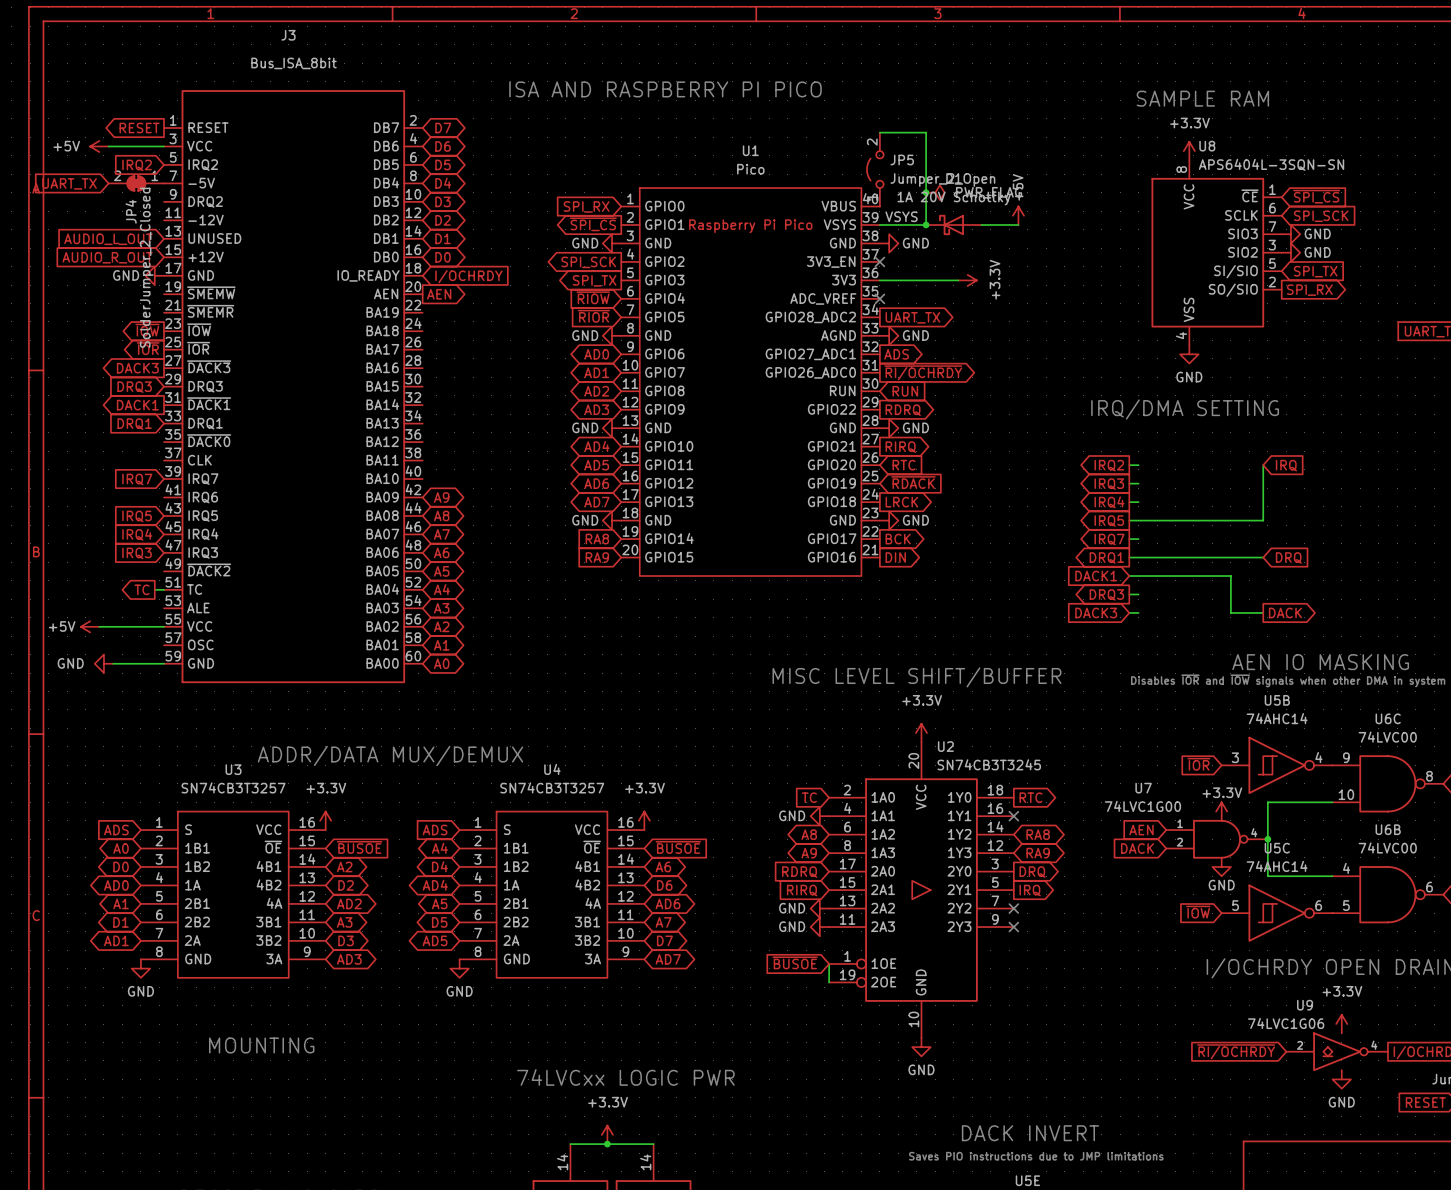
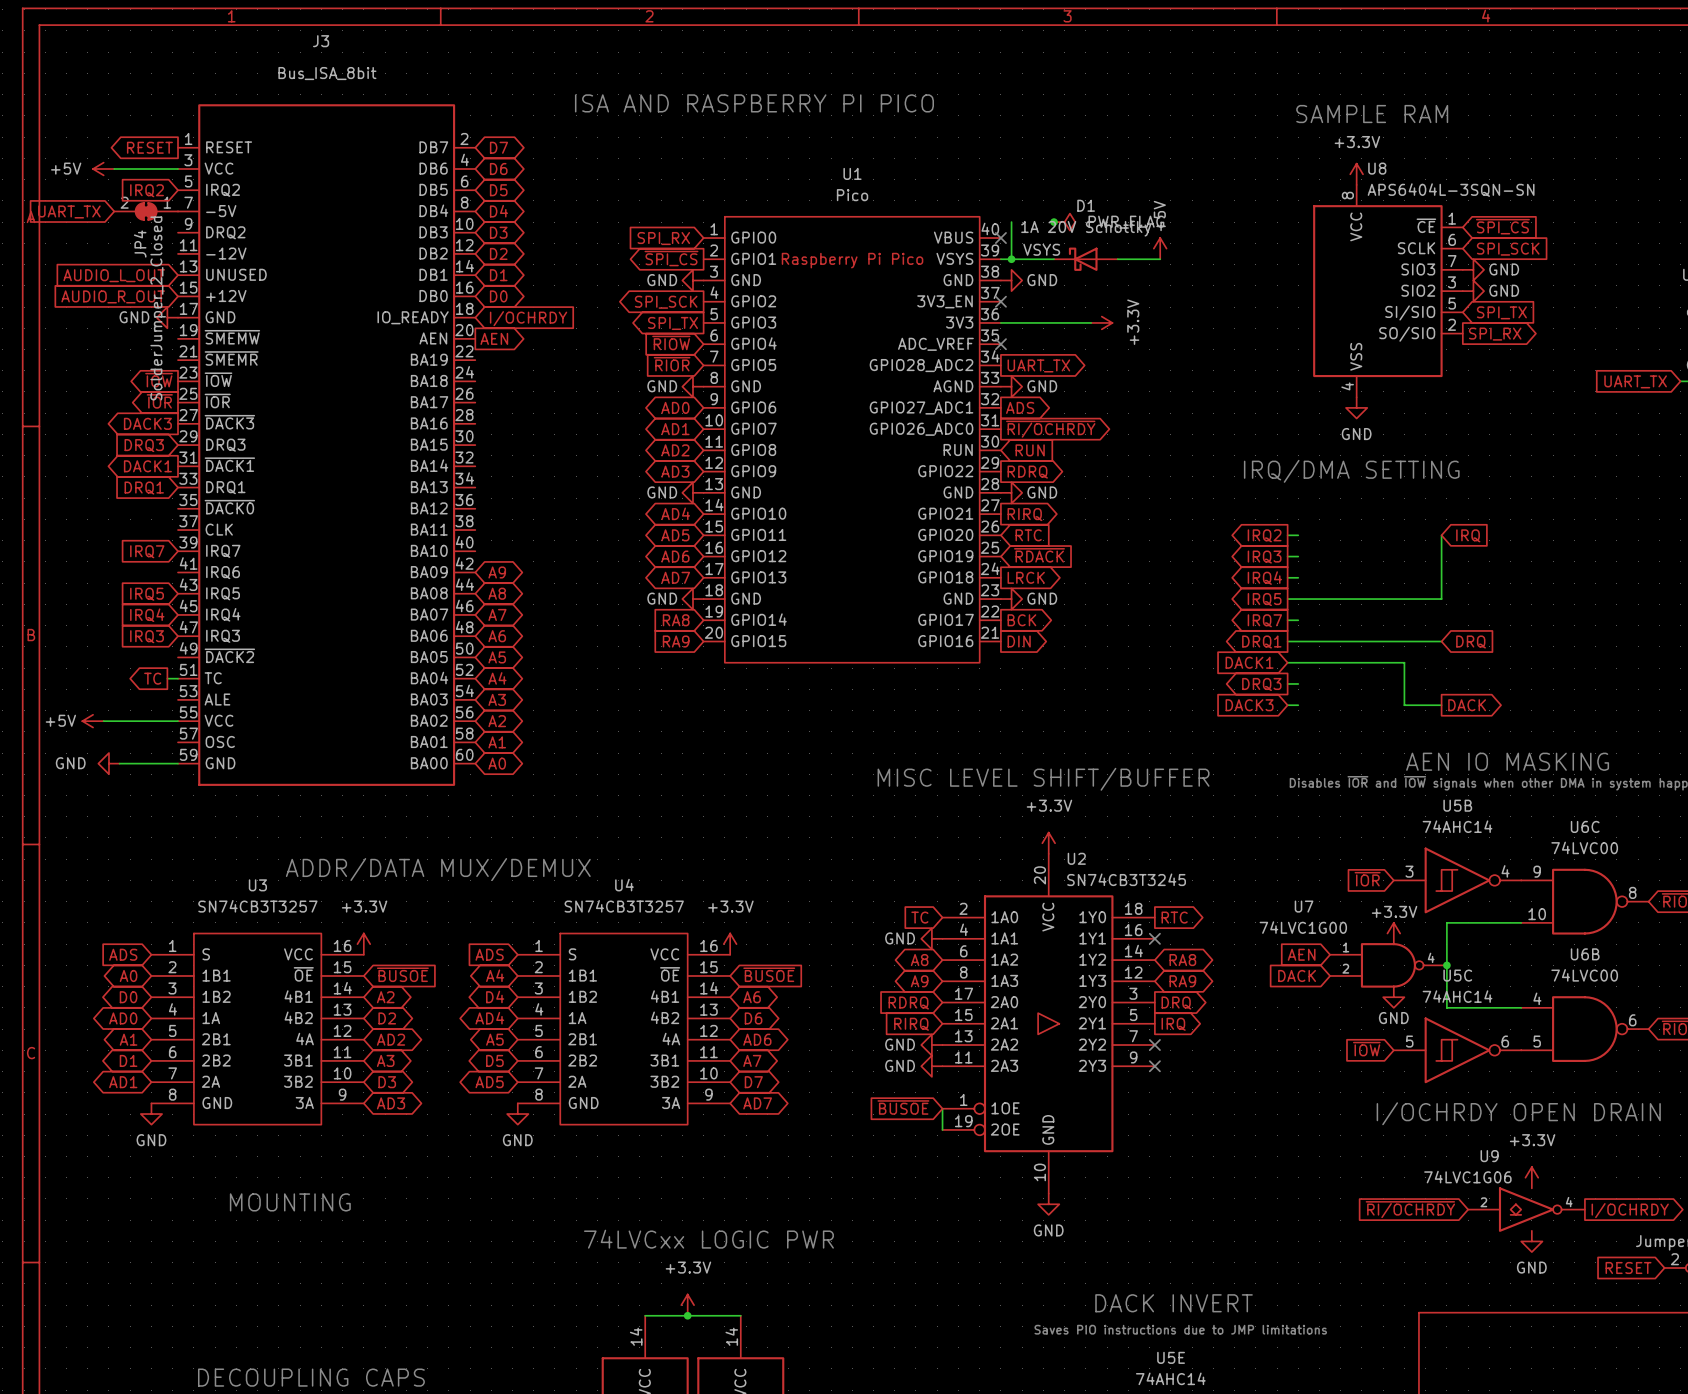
wire: (879, 132) (926, 132) (926, 225) -> none
JP5: Jumper_2_Open (875, 169) -> none
wire: none -> (1011, 222) (1011, 259)
no-connect mark: none -> (1000, 238)
label position: VSYS (901, 216) -> VSYS (1041, 249)
junction position: (926, 225) -> (1011, 259)

